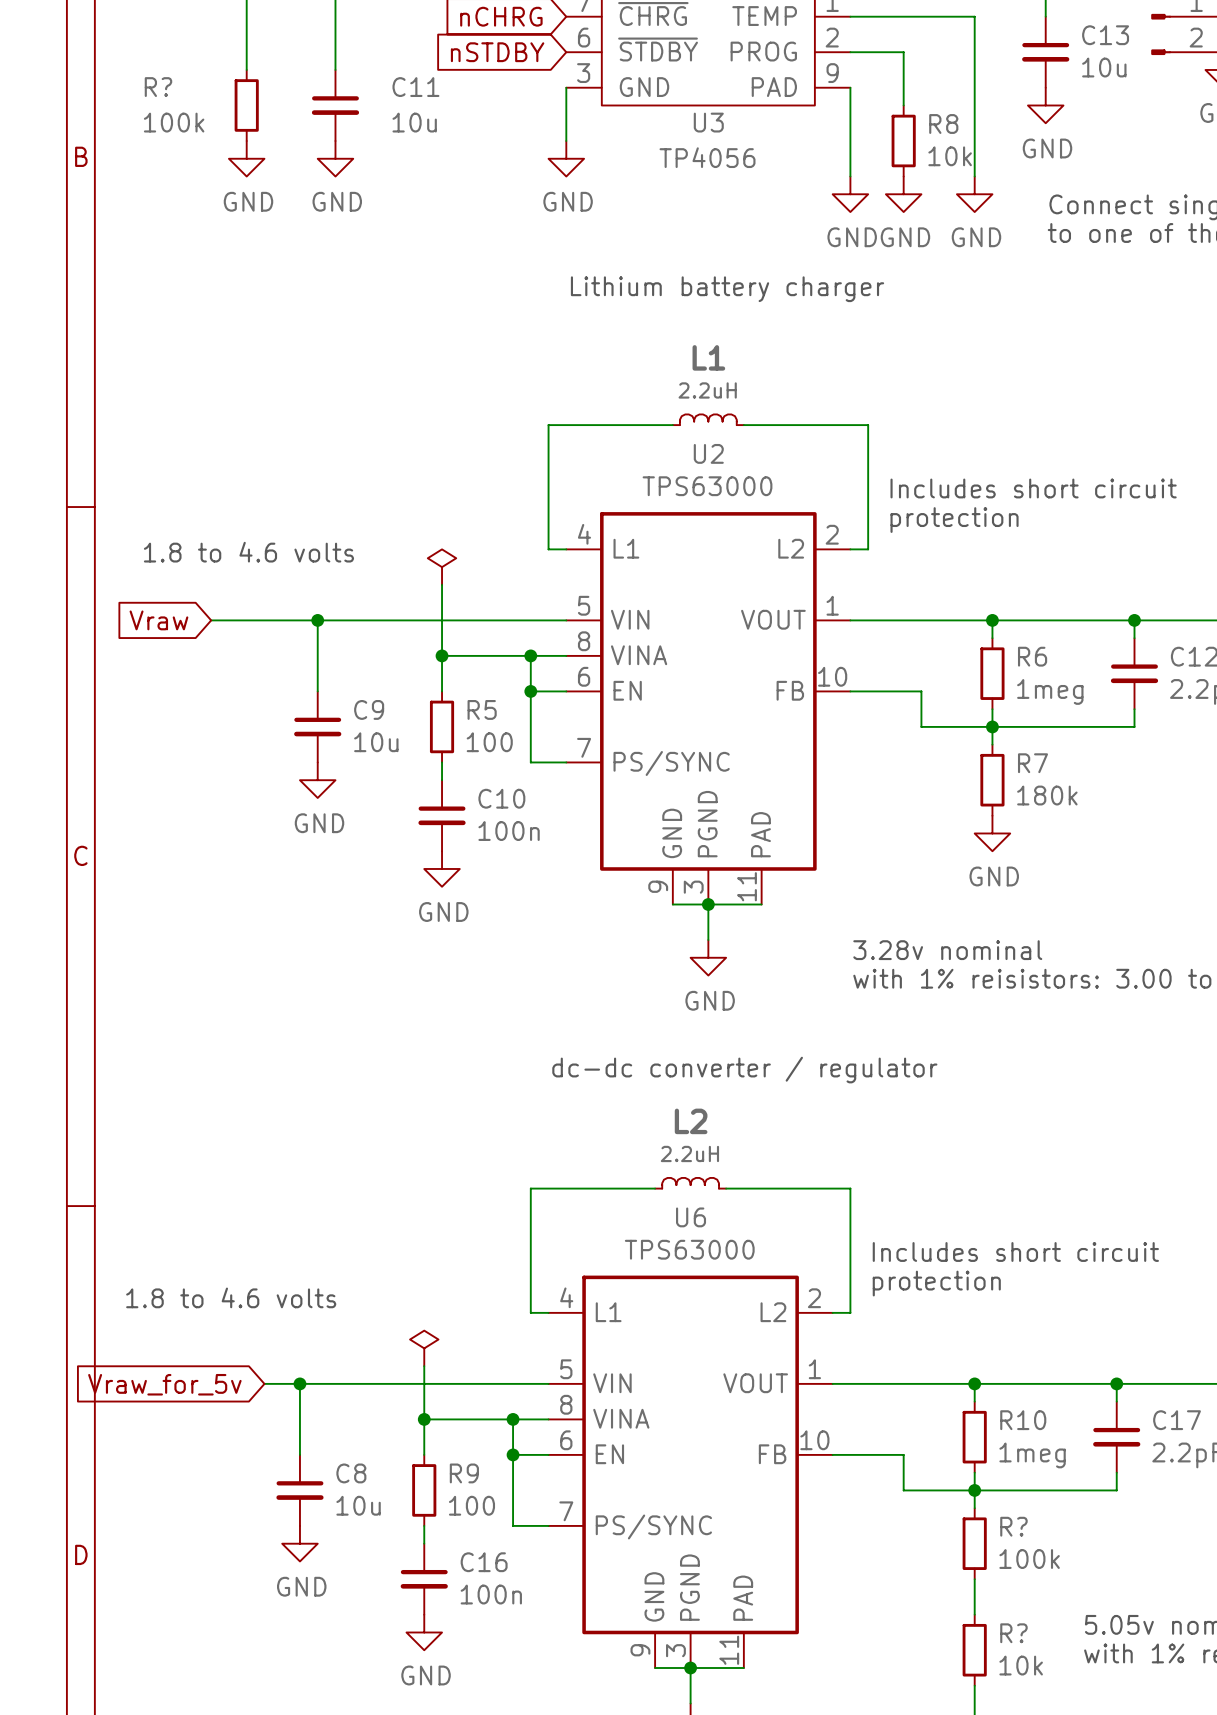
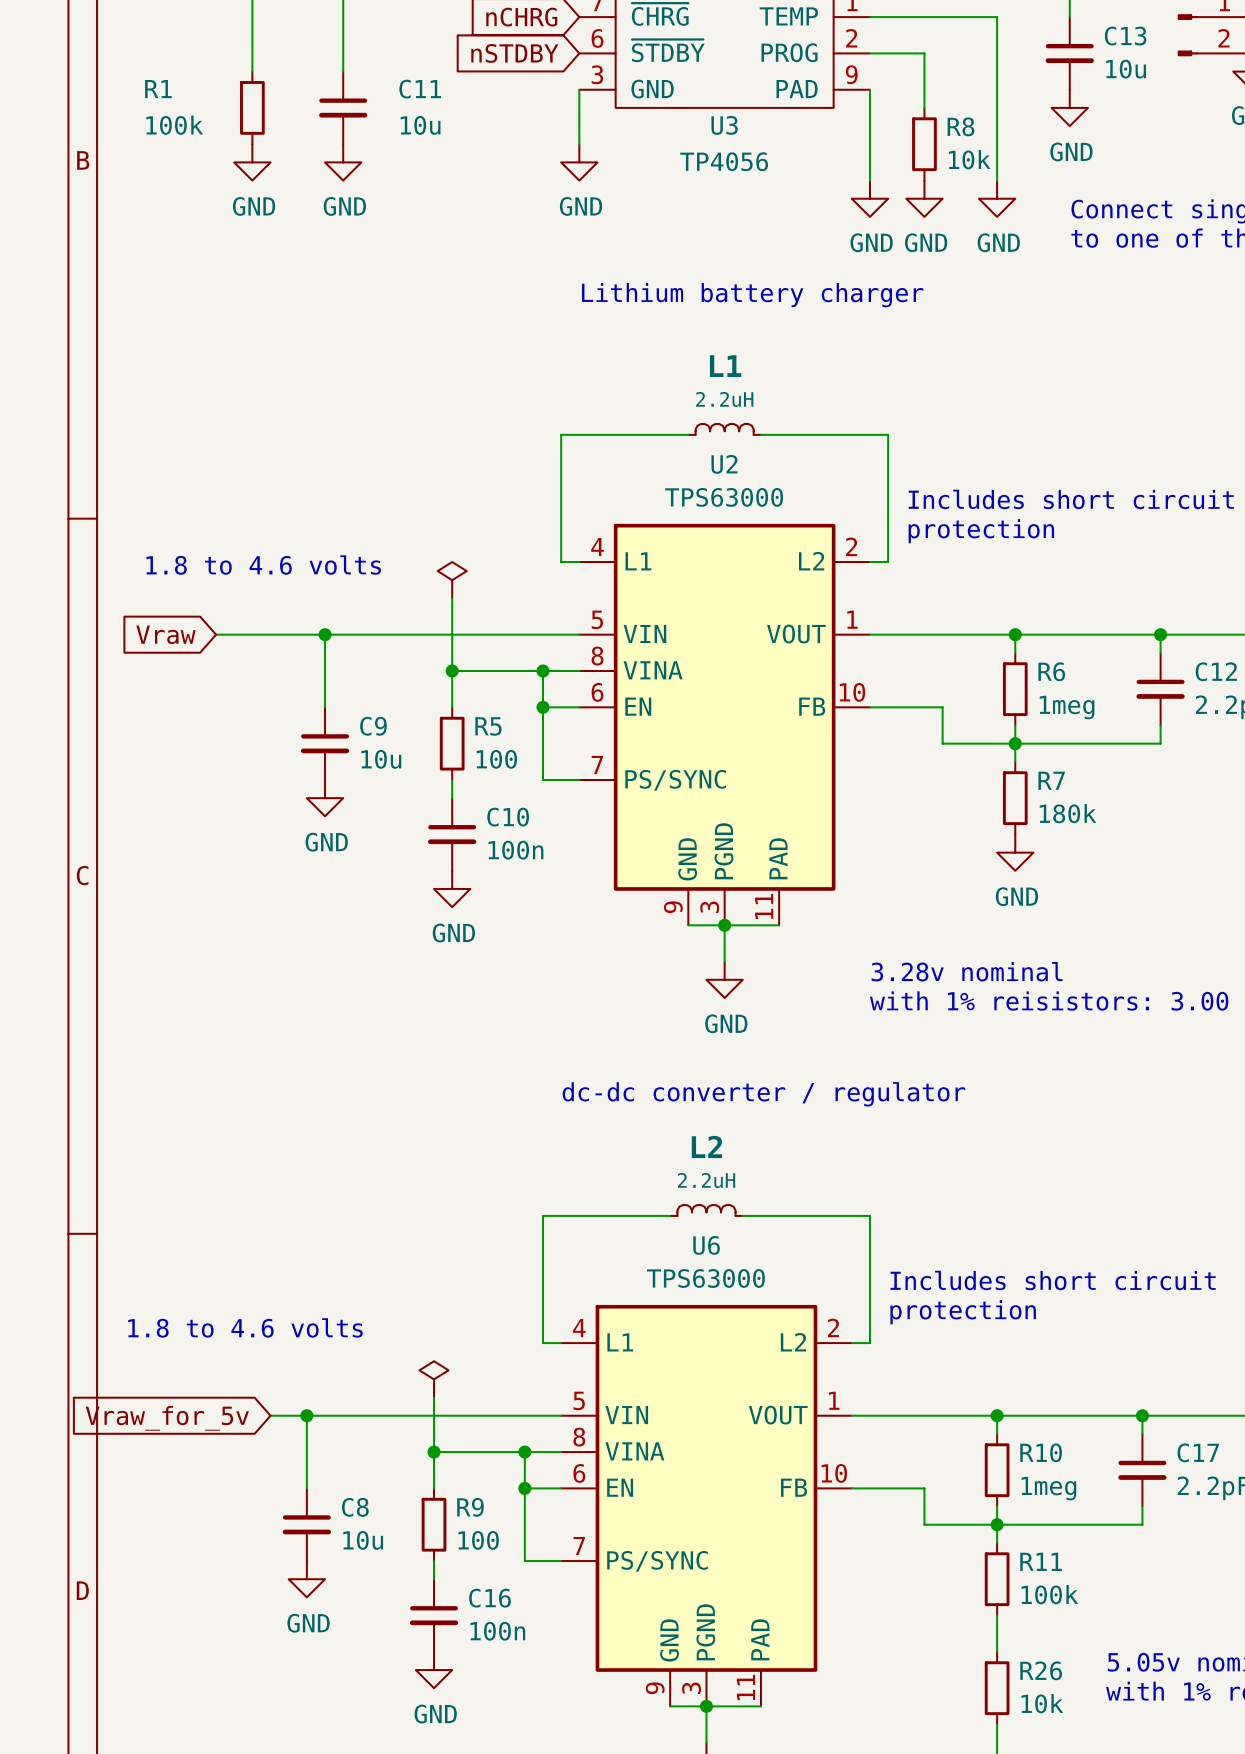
R? name: R? (158, 87) -> R1 (158, 89)
R? name: R? (1013, 1526) -> R11 (1041, 1561)
R? name: R? (1013, 1633) -> R26 (1041, 1670)

